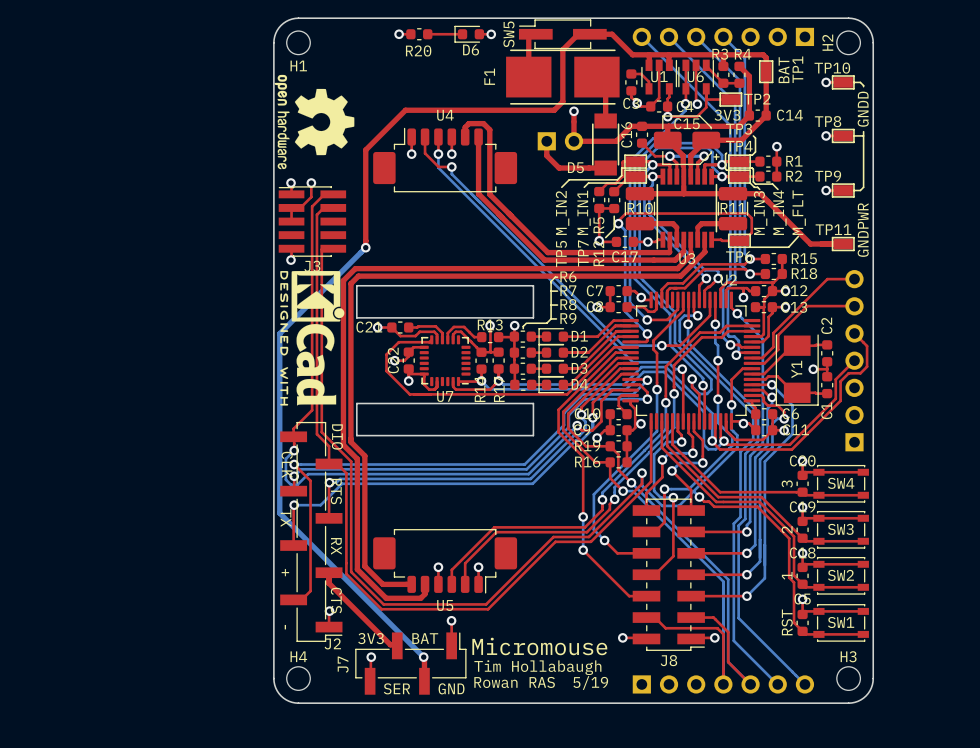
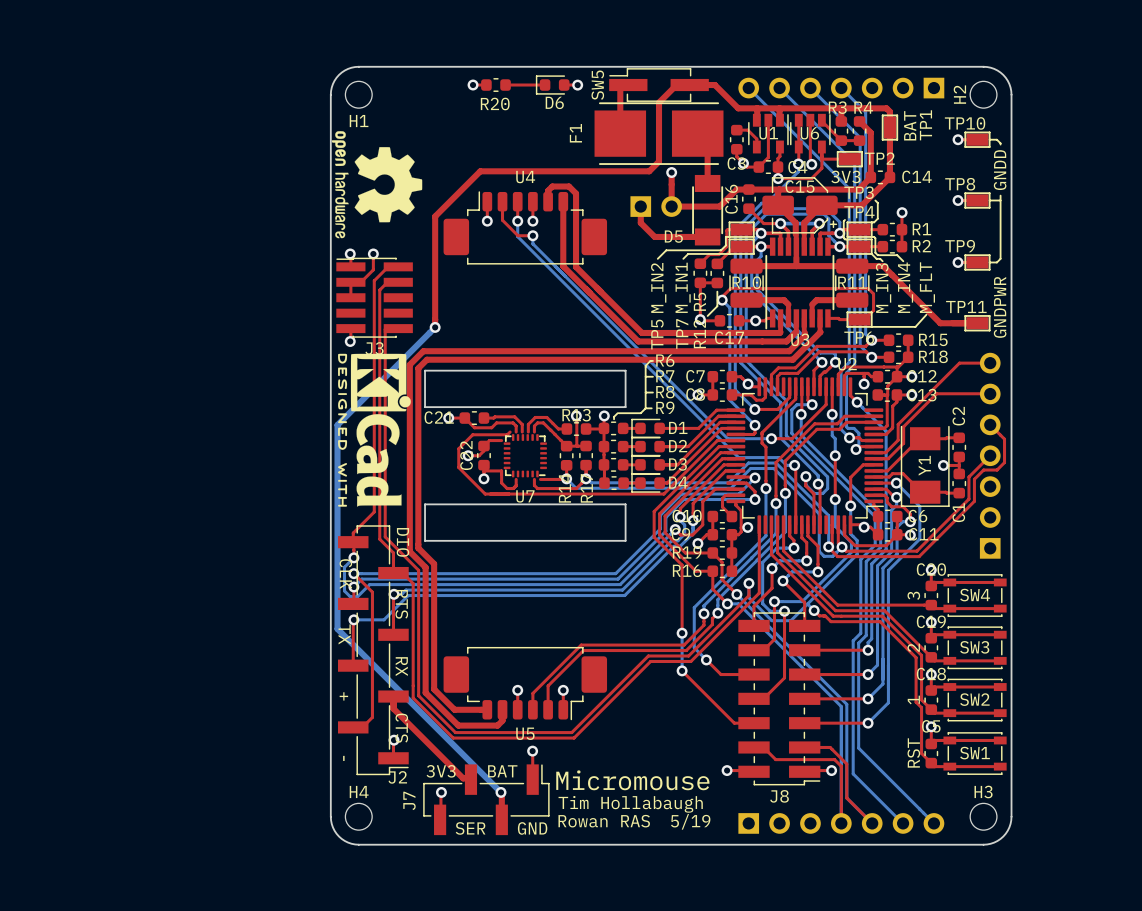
U7 footprint: [419, 335, 471, 387] -> [503, 434, 547, 478]

